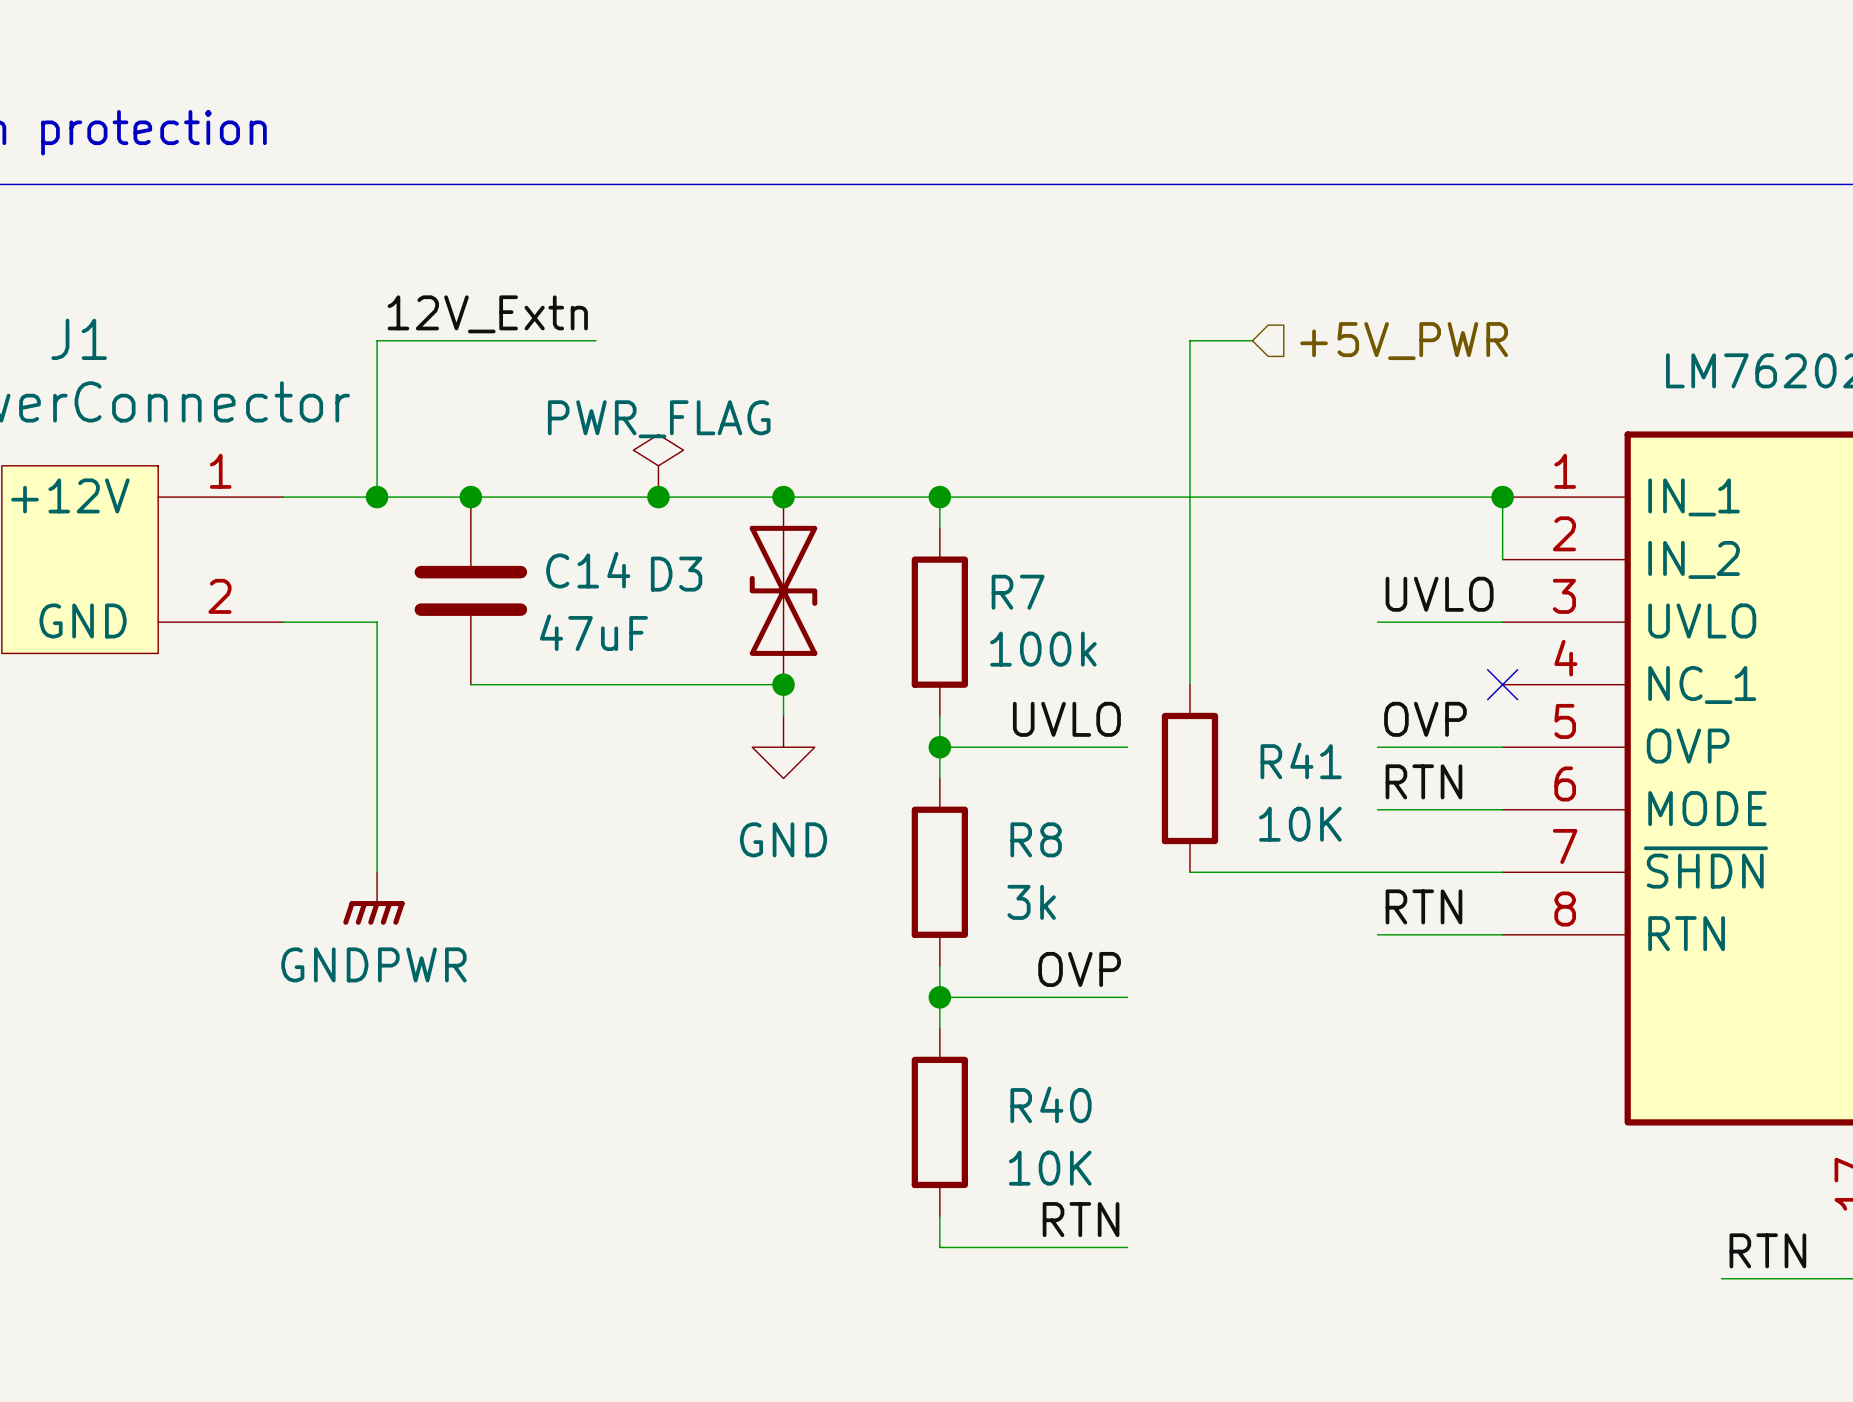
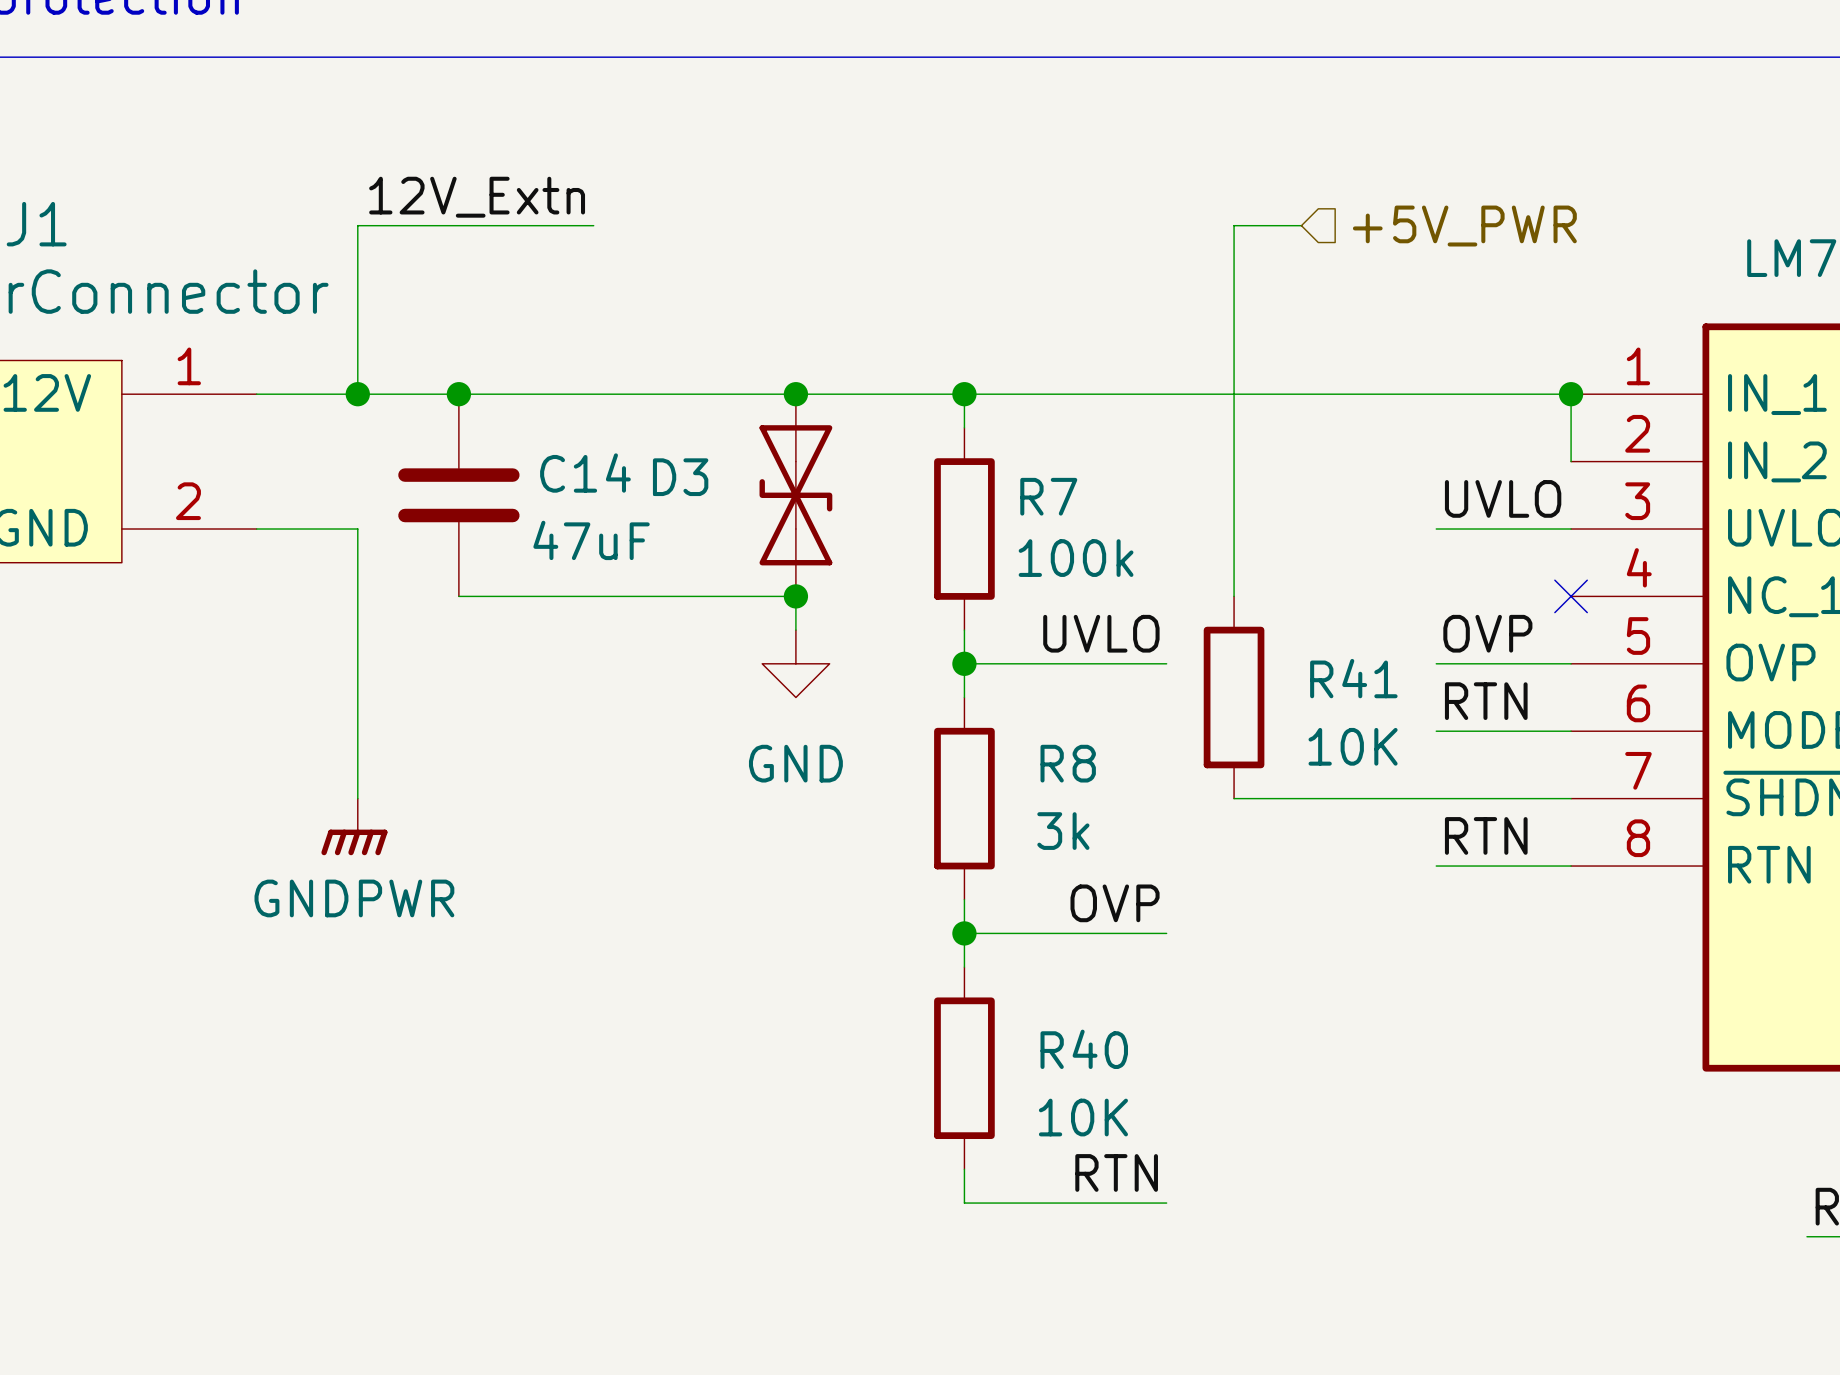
power symbol: PWR_FLAG (658, 465) -> none
junction: (658, 497) -> none

